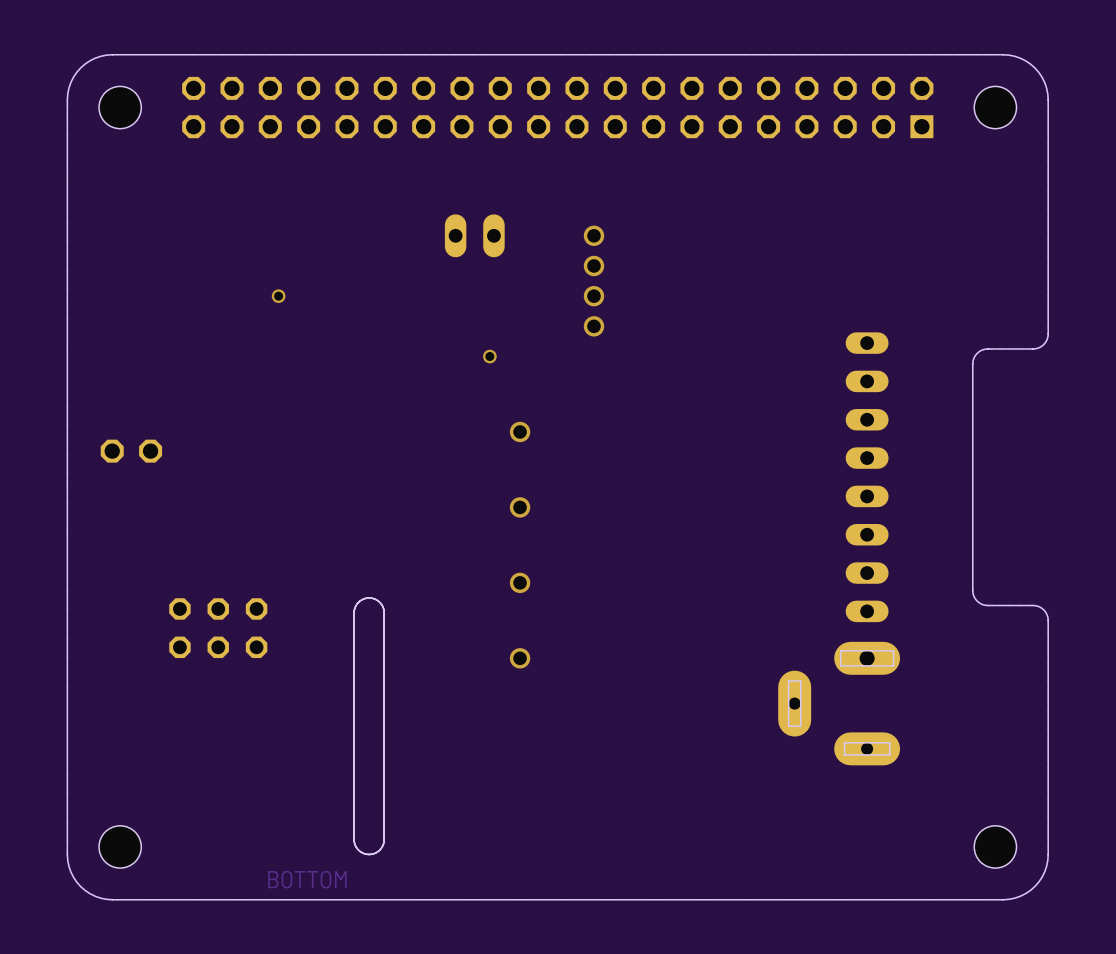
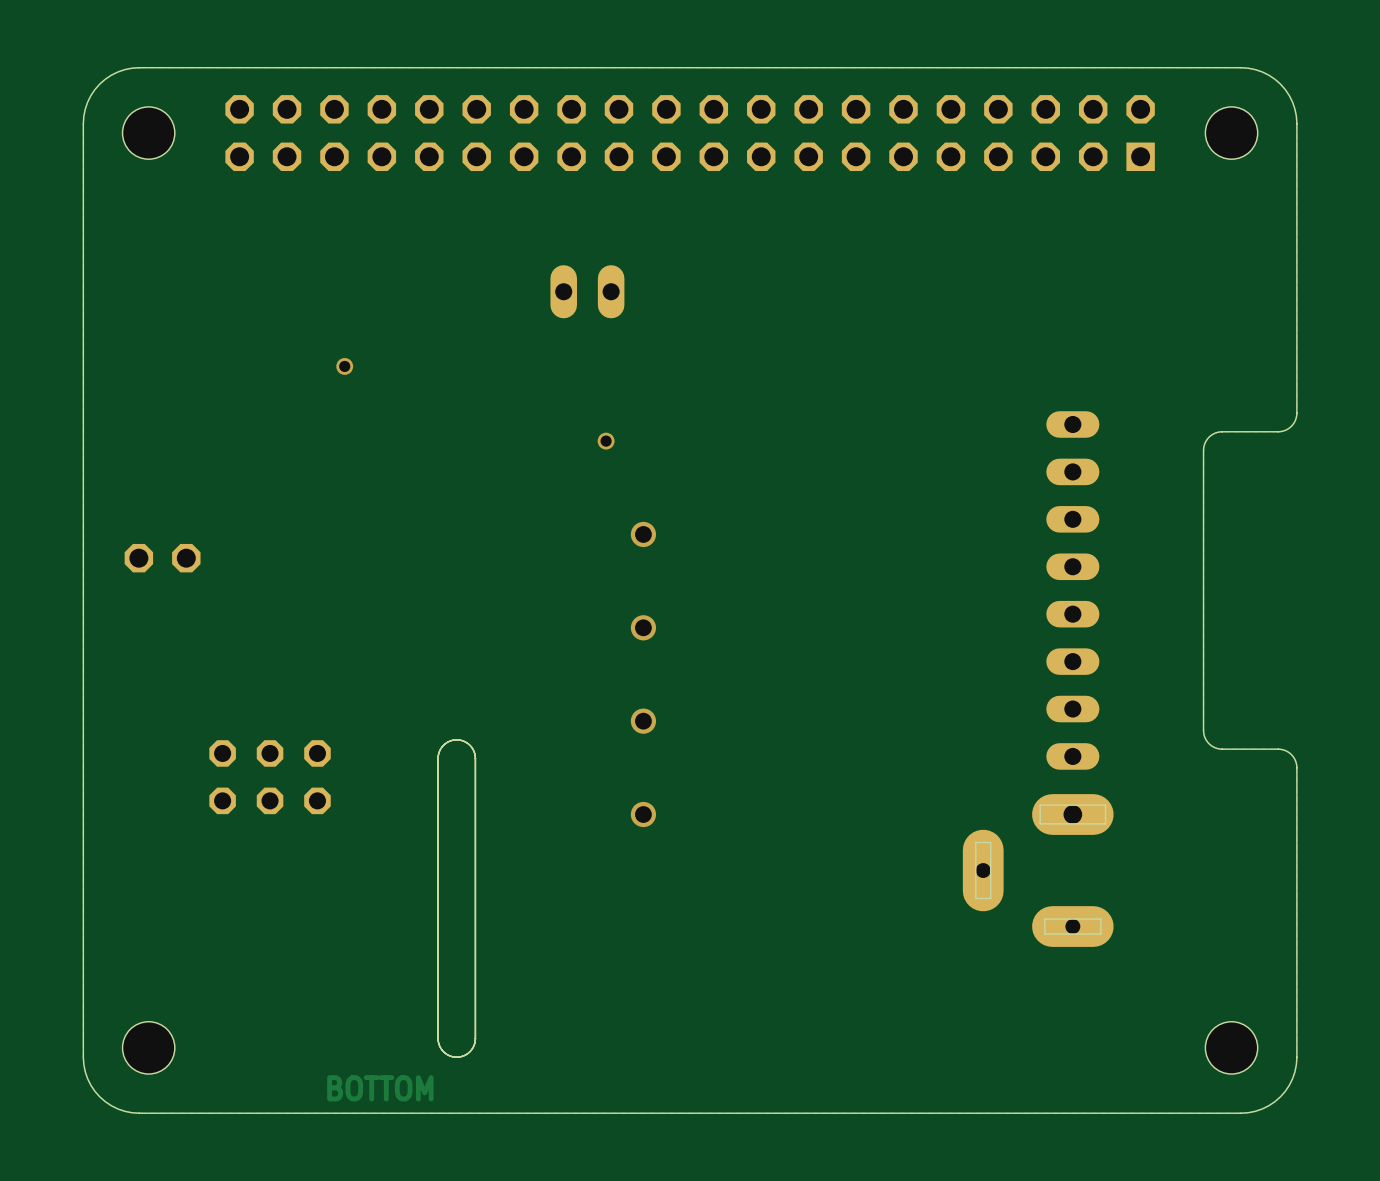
via: (593, 235) -> none
via: (593, 265) -> none
via: (593, 296) -> none
via: (593, 326) -> none

